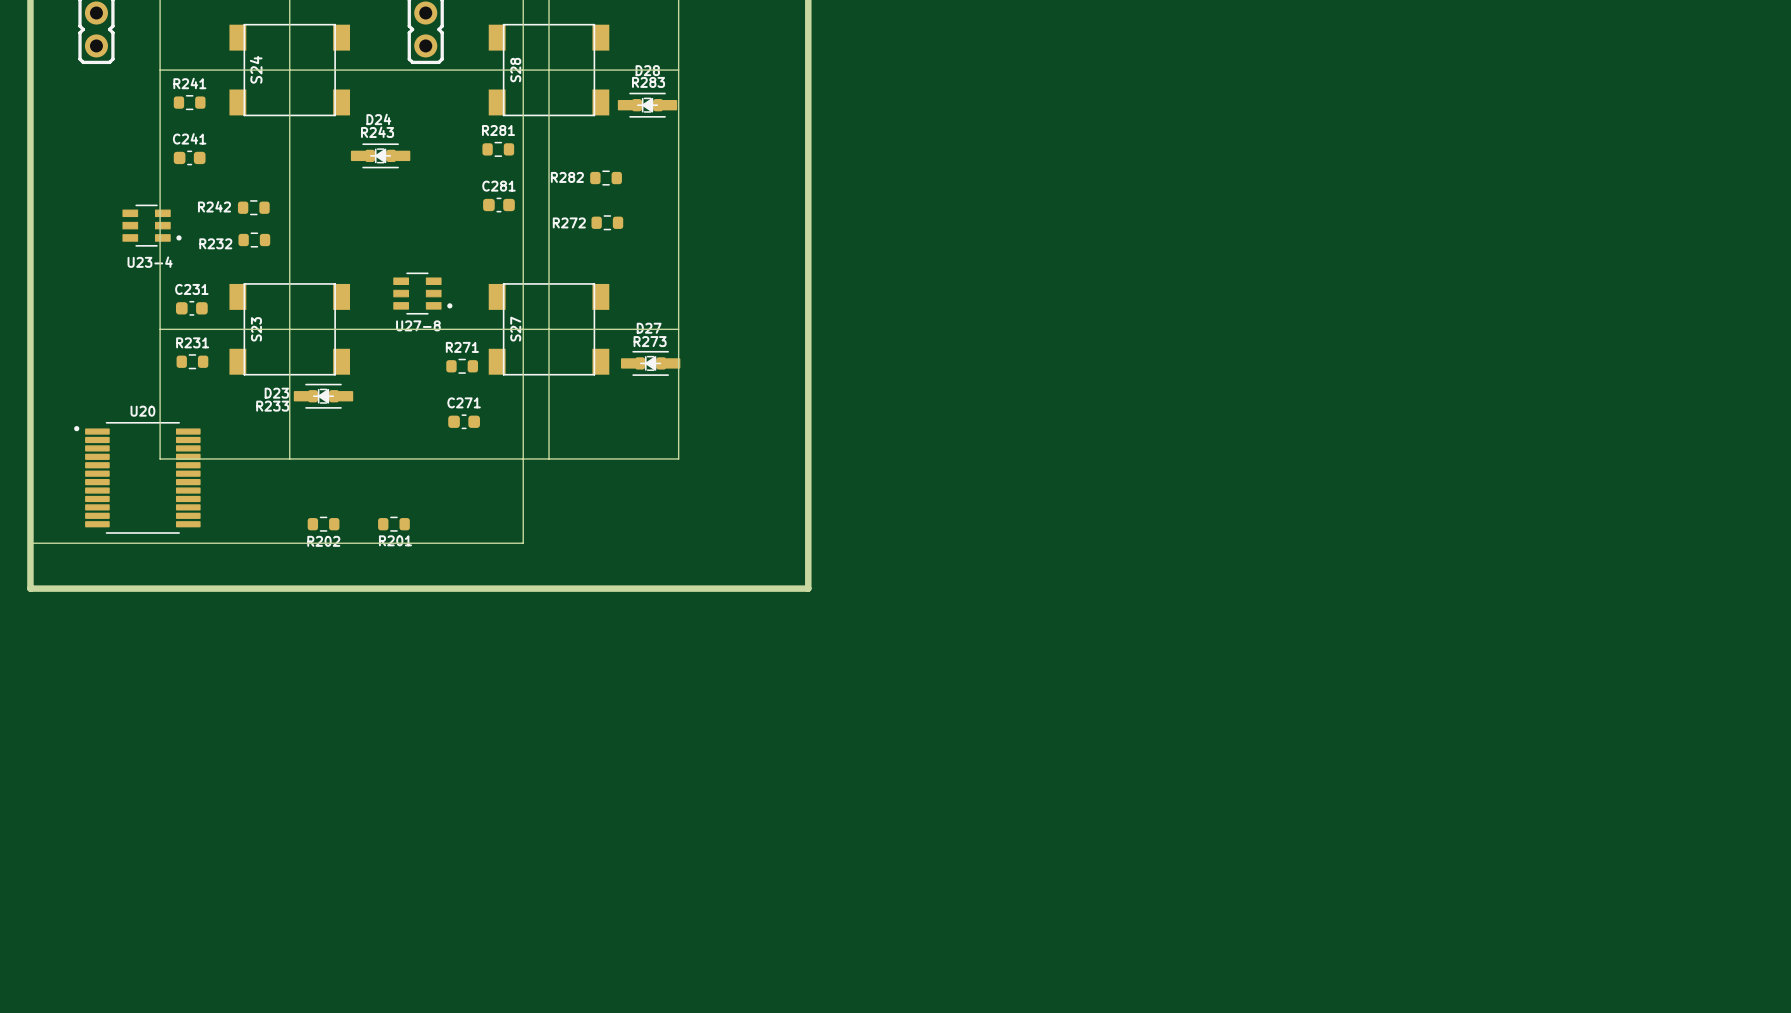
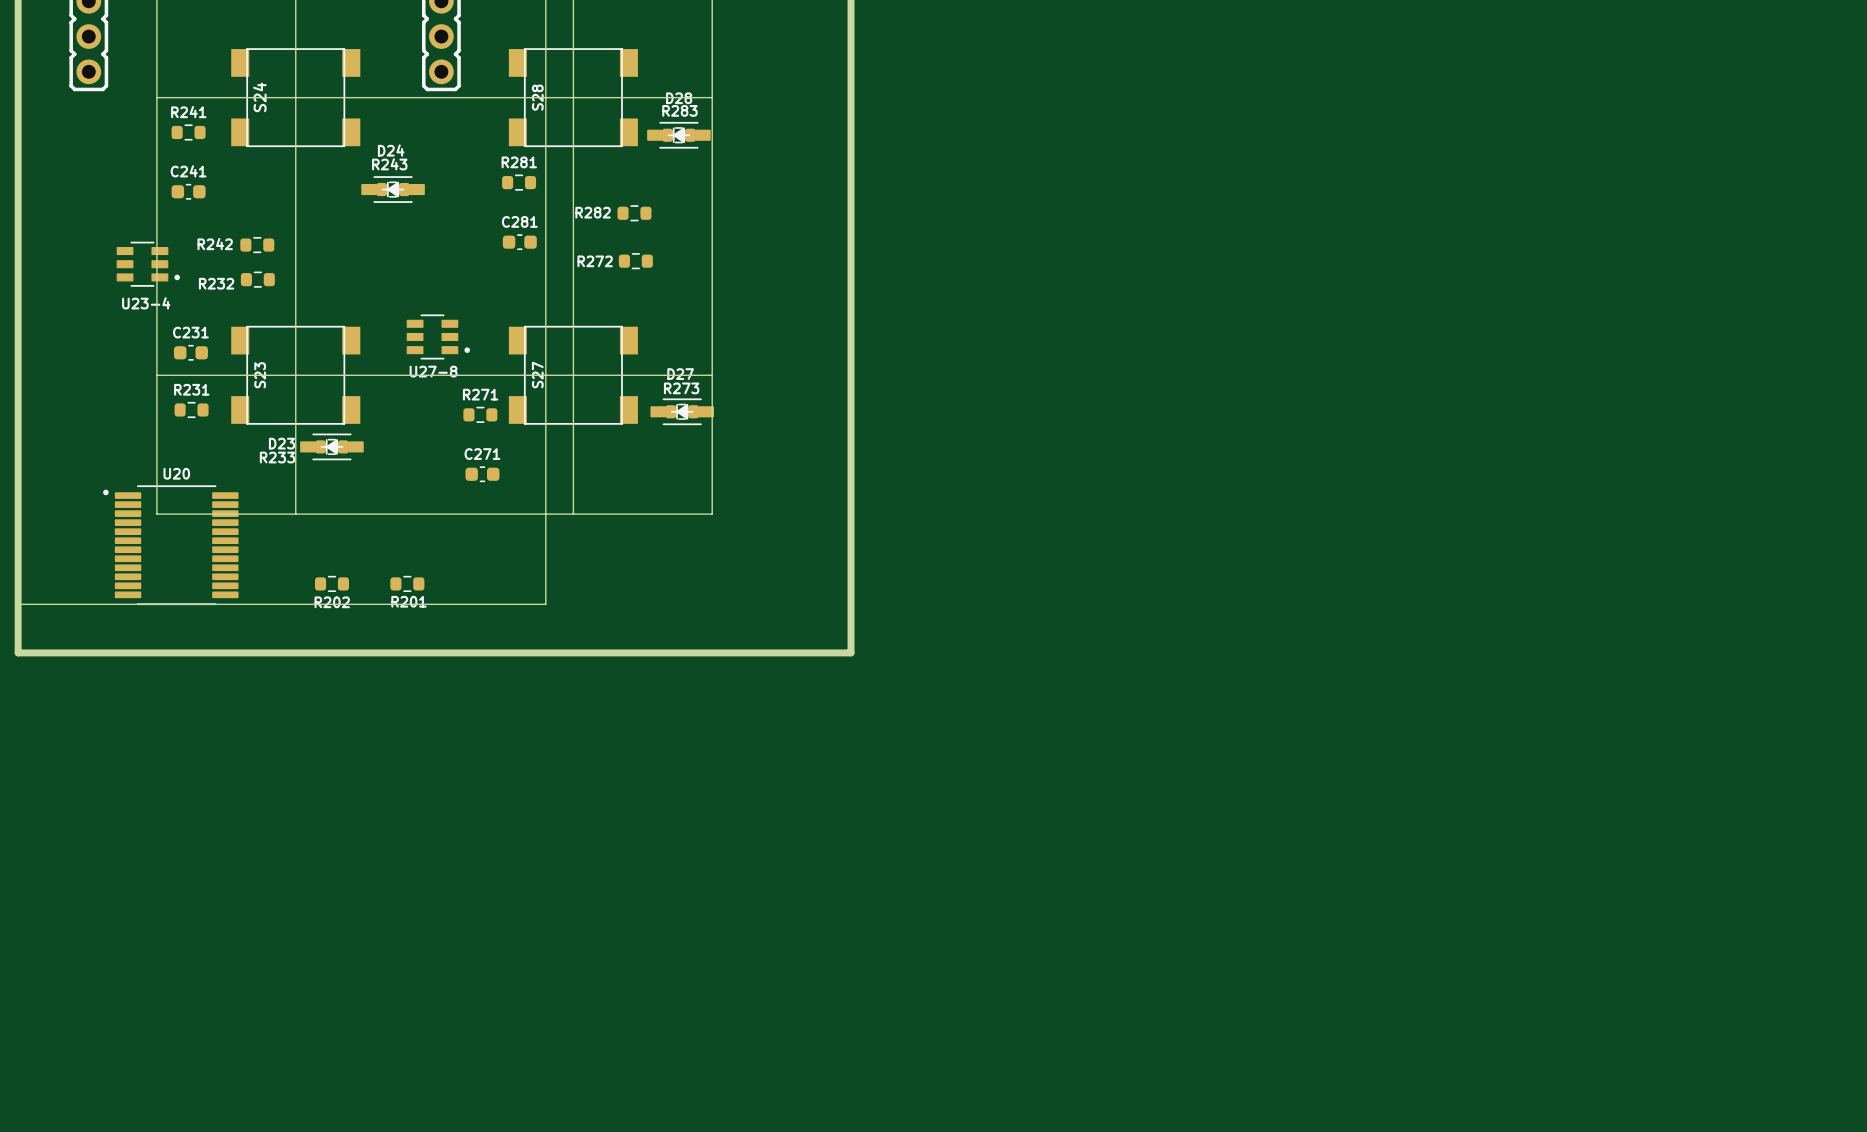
U20 position: (137, 477) -> (170, 545)

